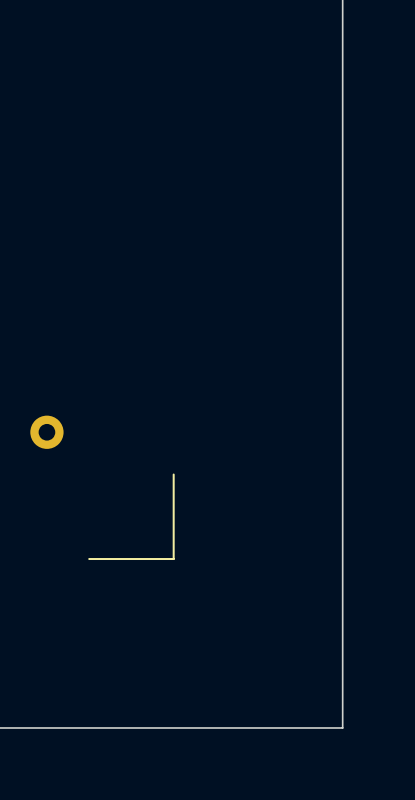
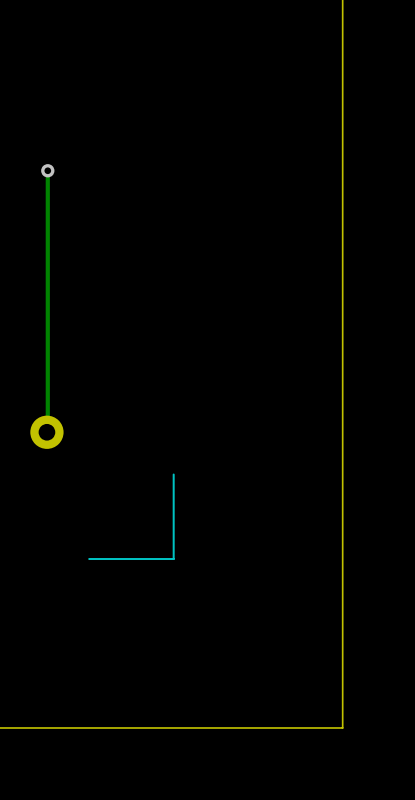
track: none -> (47, 170) (46, 432)
via: none -> (47, 170)

